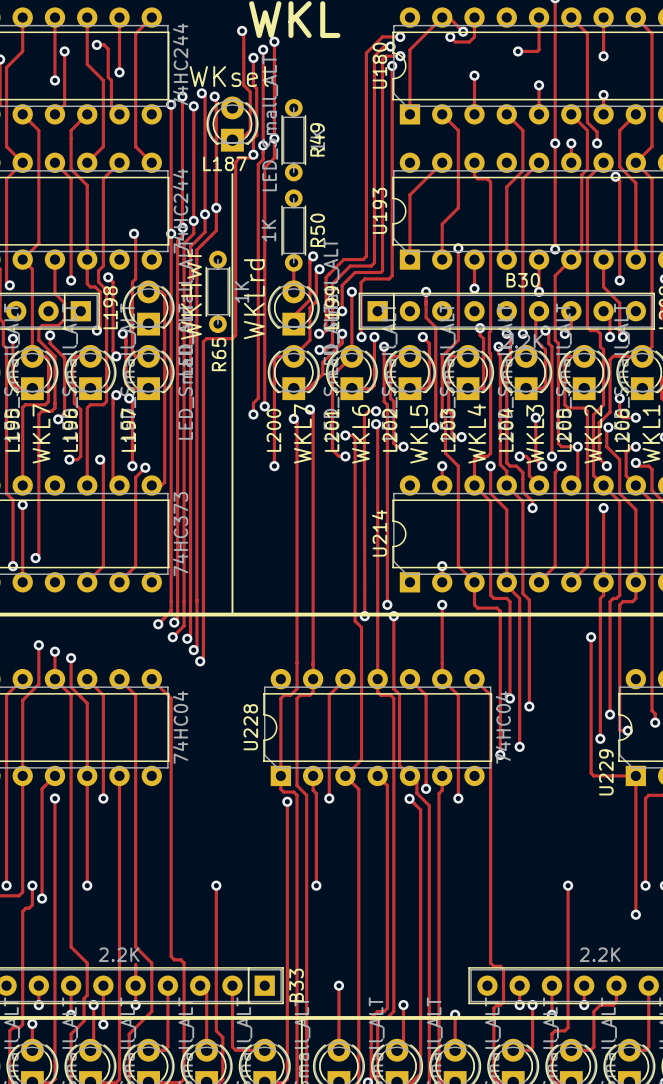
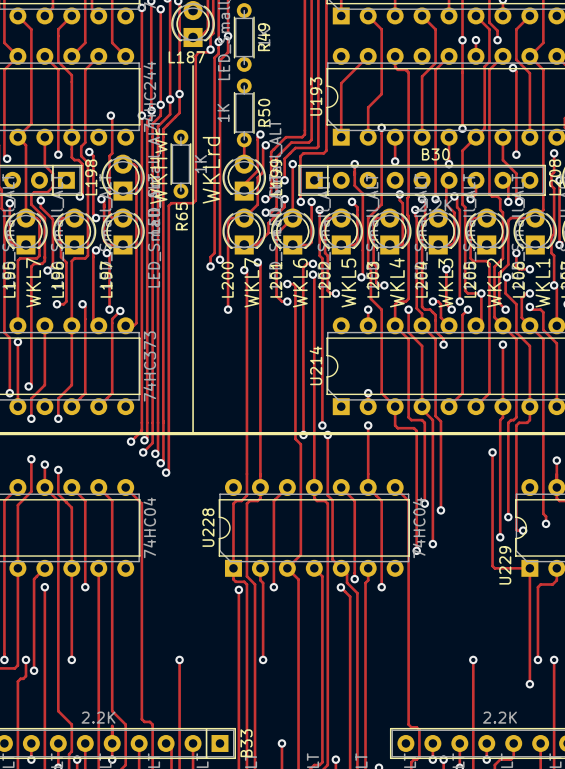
track: none -> (44, 325) (44, 385) (31, 398) (31, 418)
track: none -> (71, 325) (71, 385) (58, 398) (58, 418)
via: none -> (31, 418)
via: none -> (58, 418)

